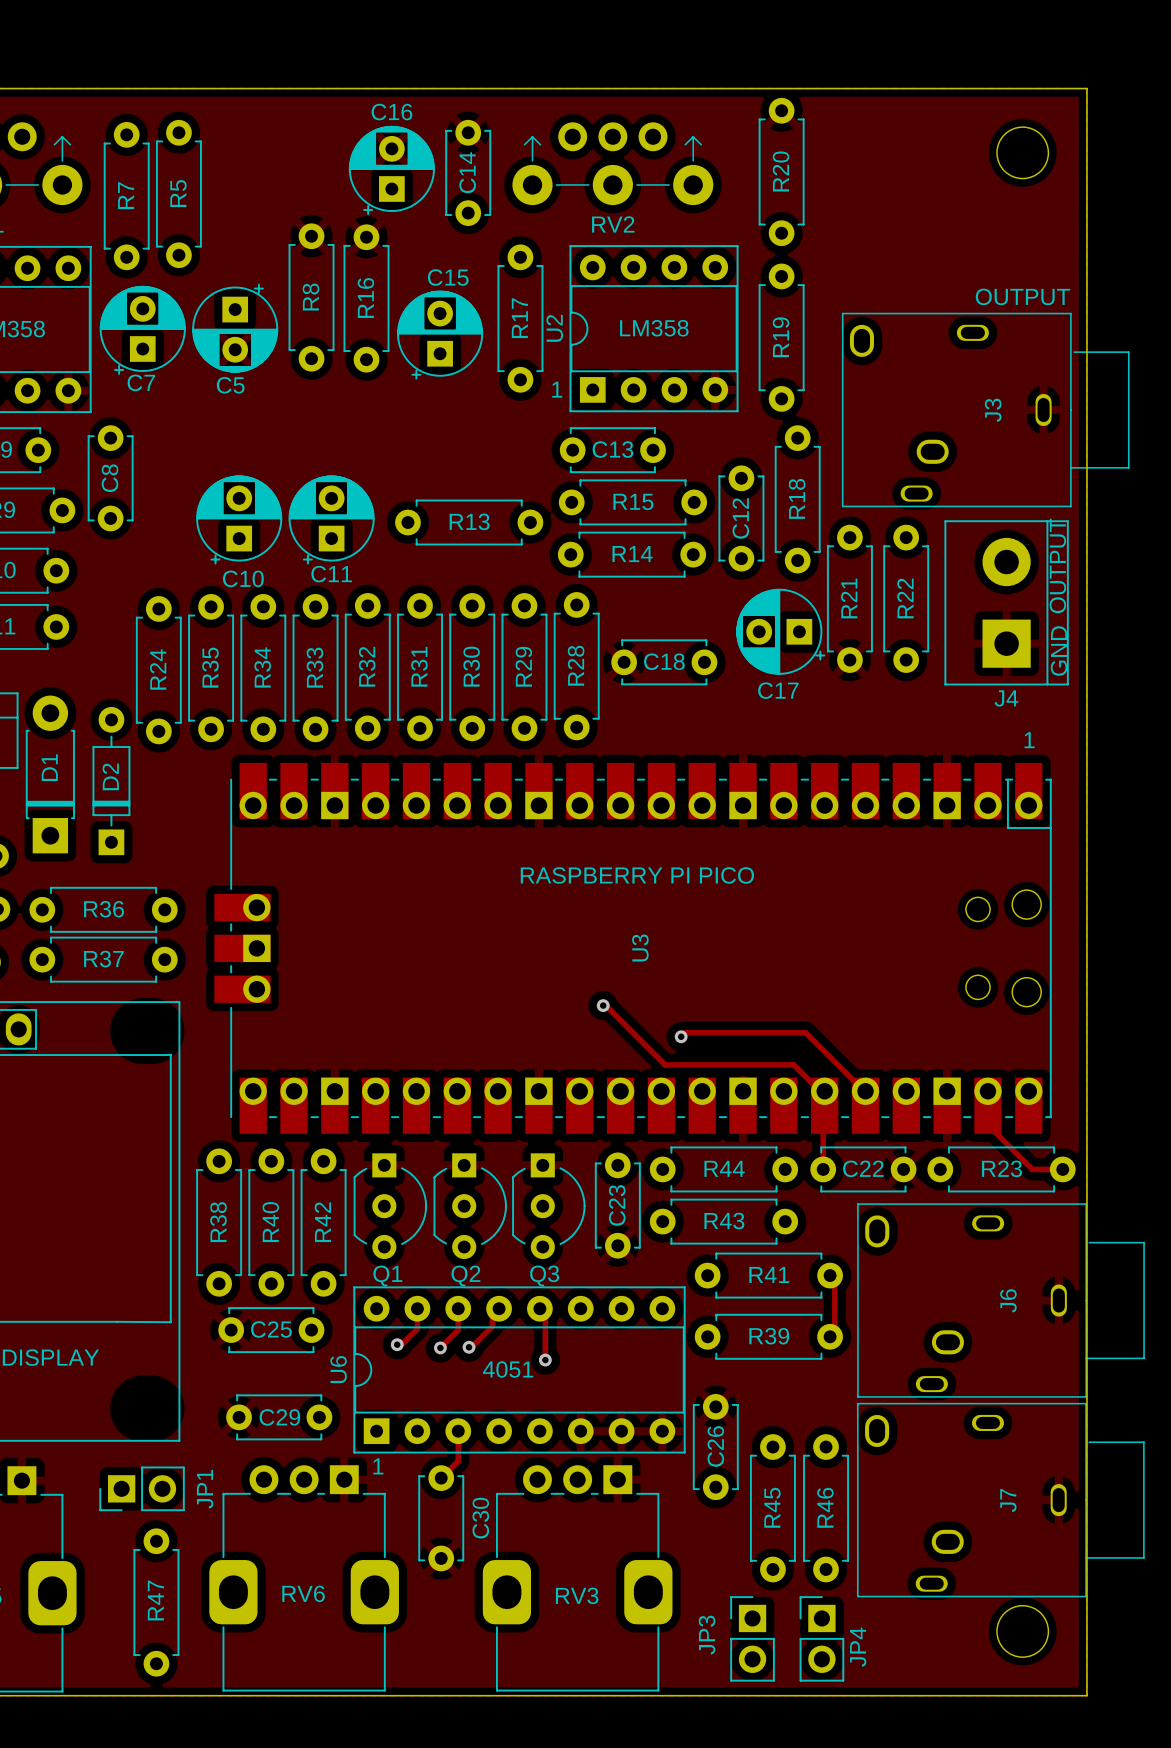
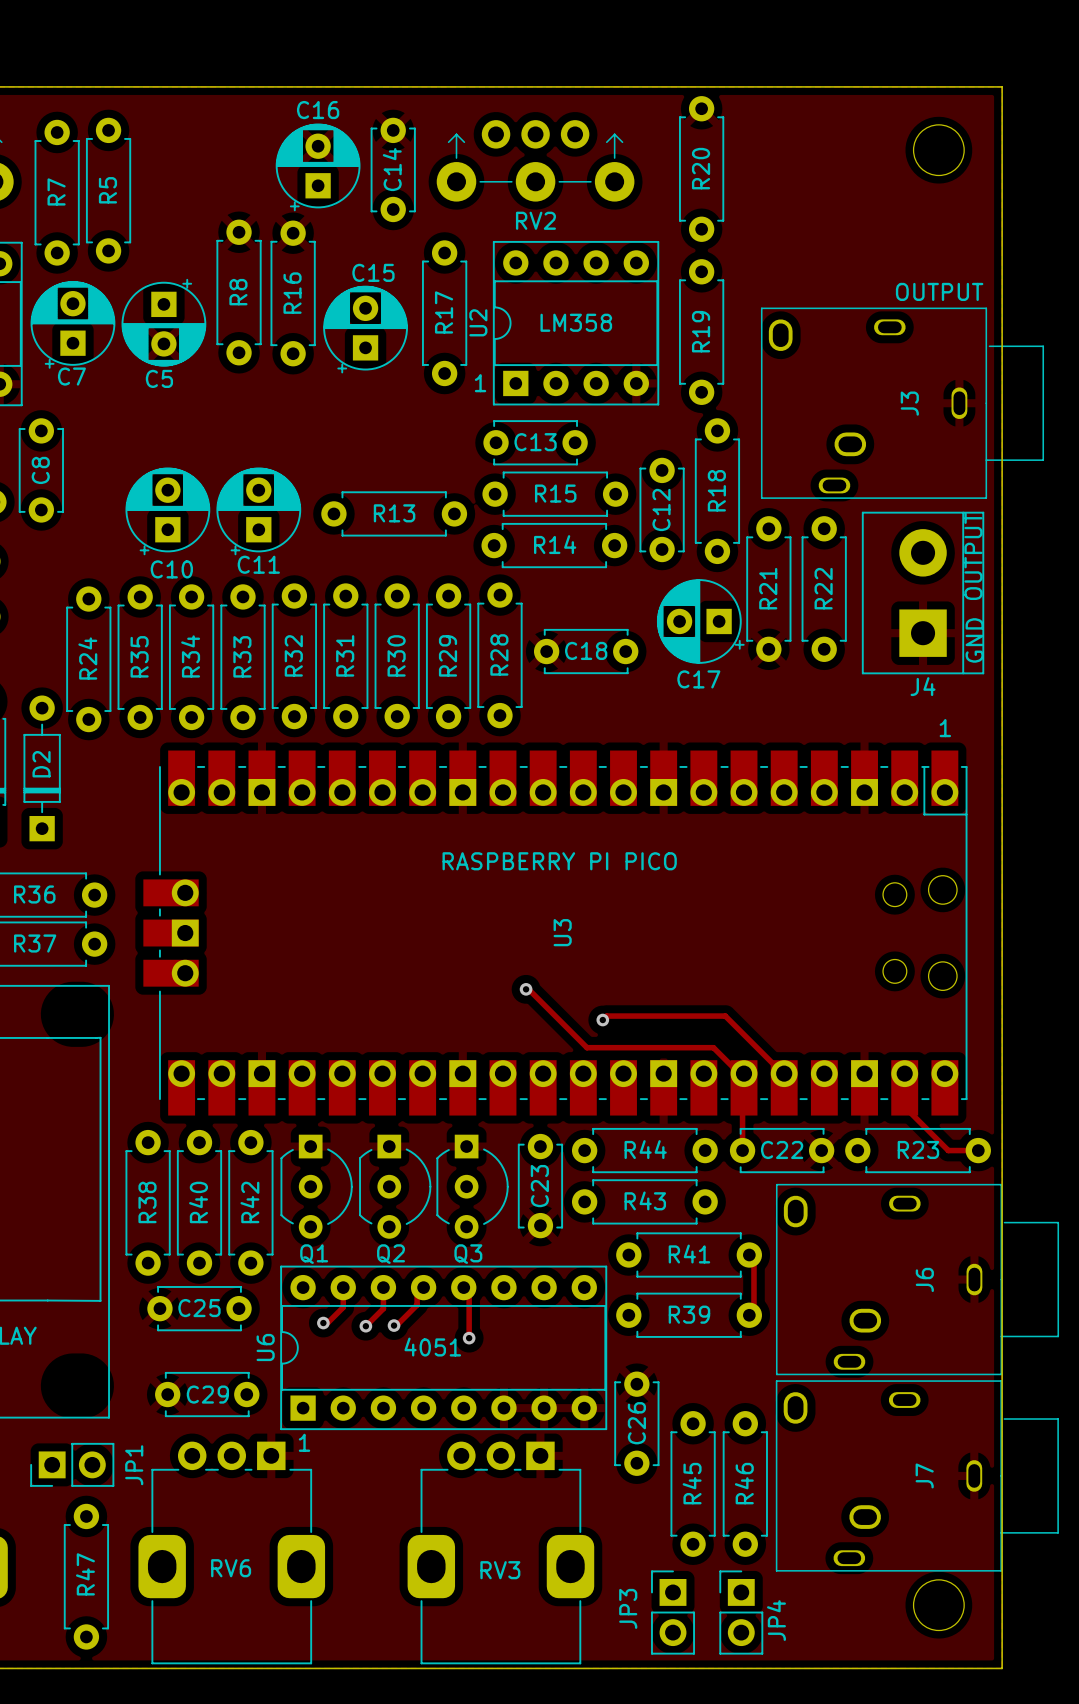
track: (458, 1431) (458, 1461) (441, 1478) -> none
C30: (441, 1518) -> none

